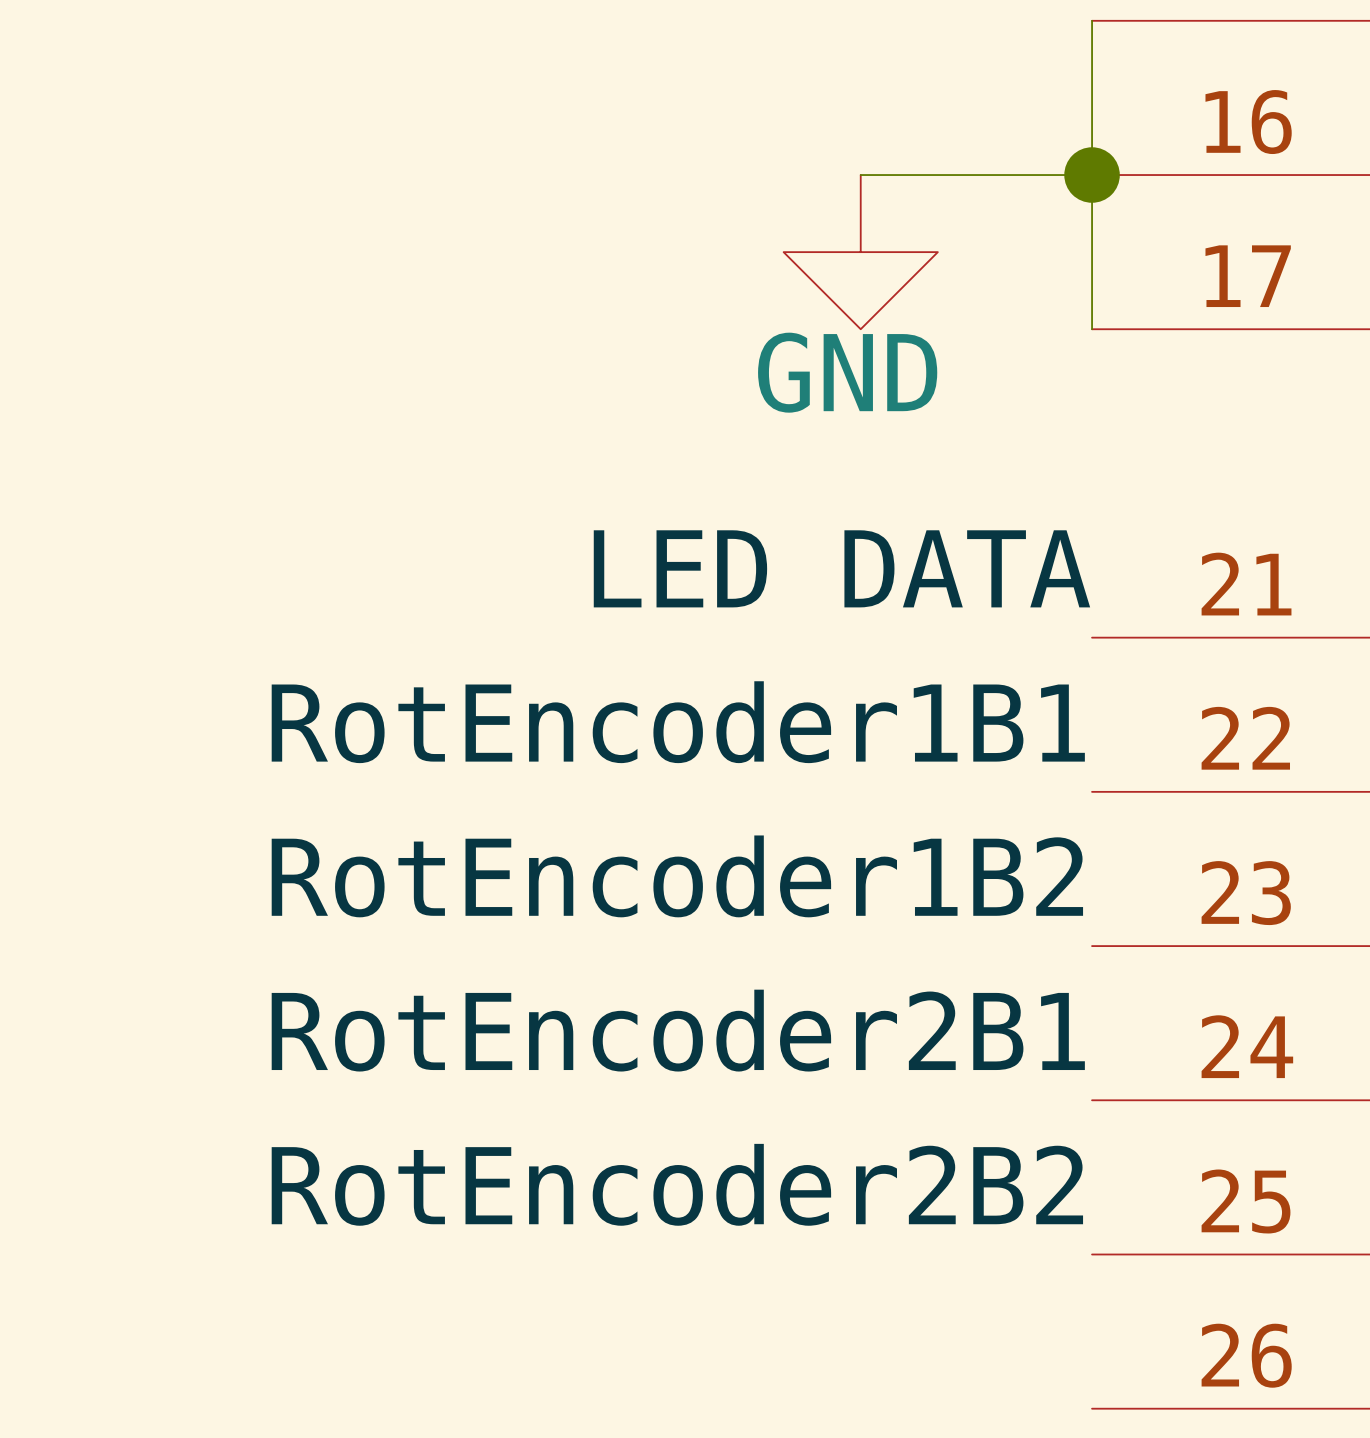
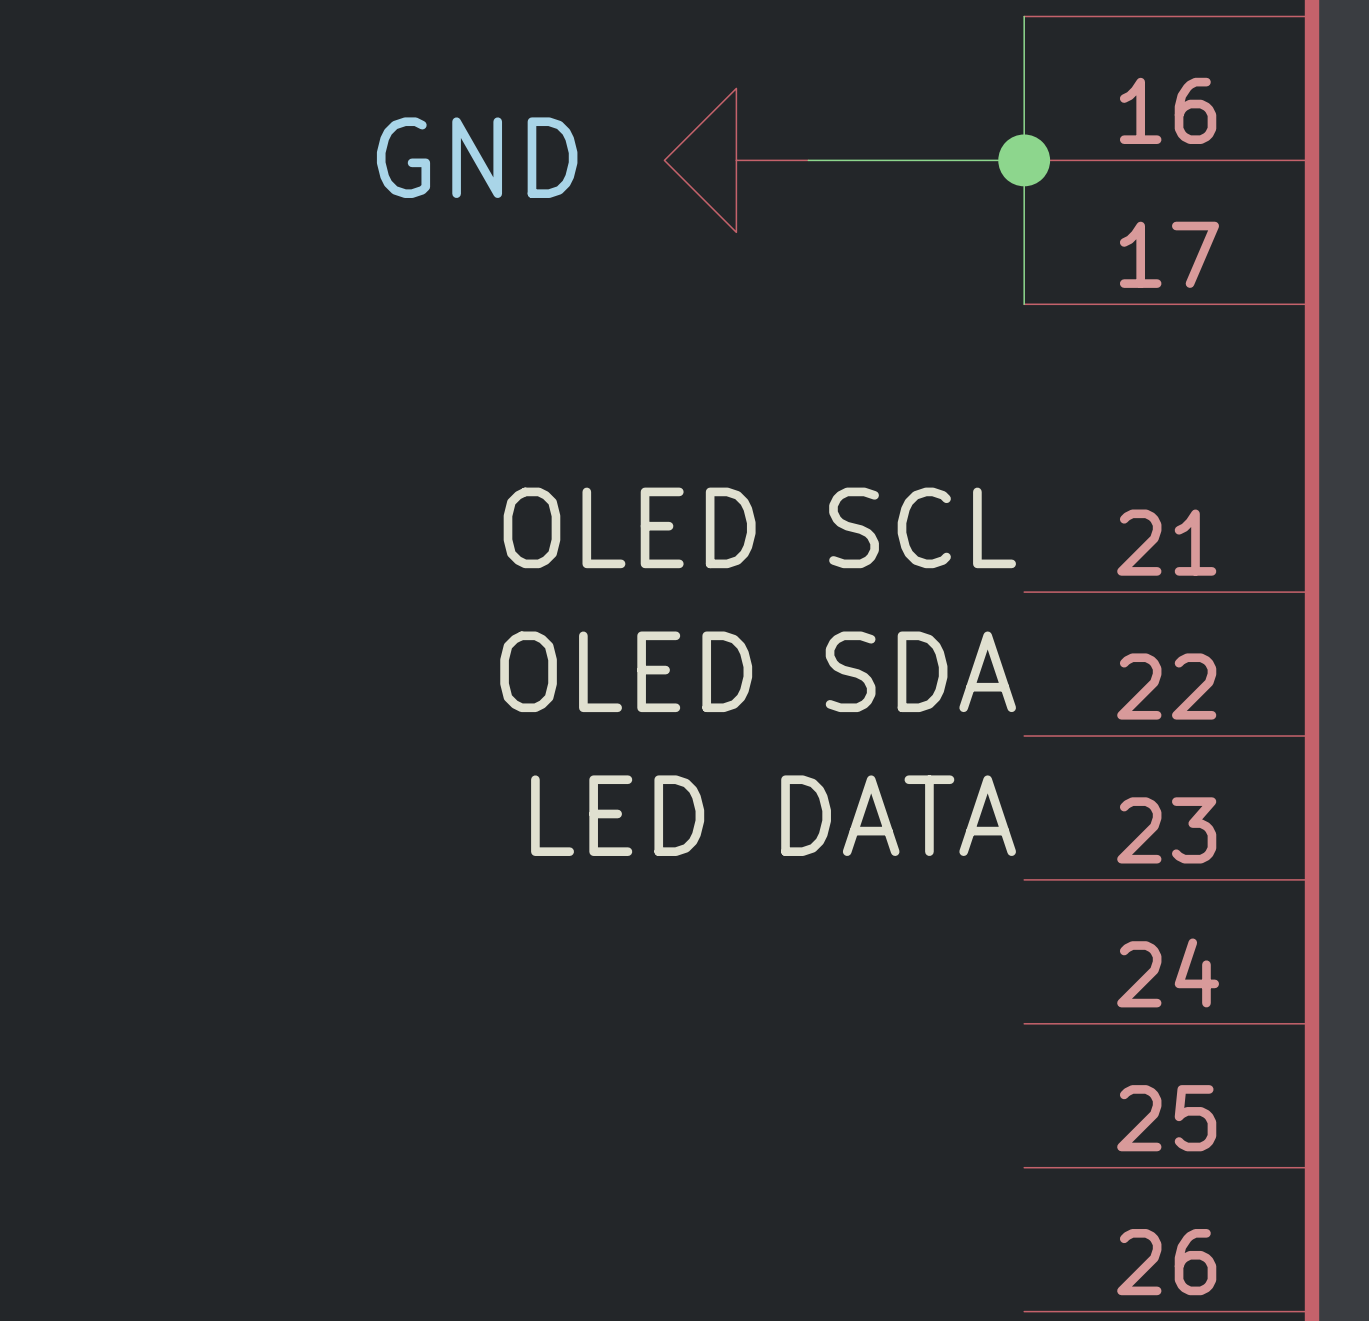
power symbol rotation: 0° (860, 252) -> 90° clockwise (736, 160)
power symbol position: GND (860, 252) -> GND (736, 160)
power symbol text position: GND (847, 372) -> GND (477, 157)
label: LED DATA (841, 568) -> OLED SCL (759, 527)
label: RotEncoder1B1 (678, 722) -> OLED SDA (758, 671)
label: RotEncoder1B2 (677, 876) -> LED DATA (773, 815)
label: RotEncoder2B1 (678, 1030) -> none
label: RotEncoder2B2 (677, 1184) -> none

